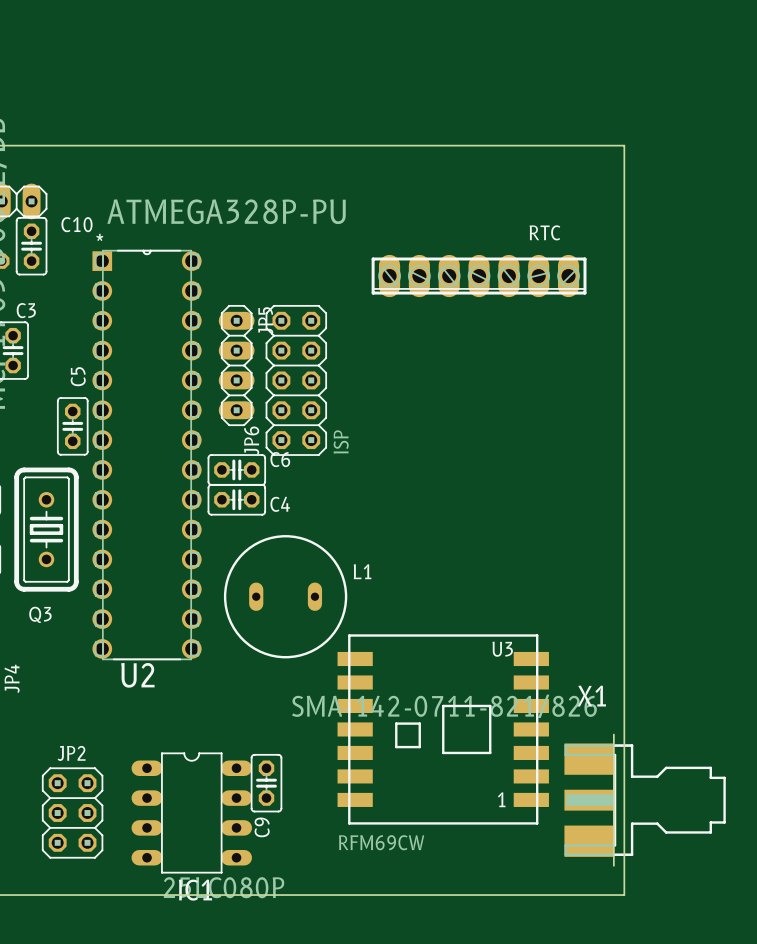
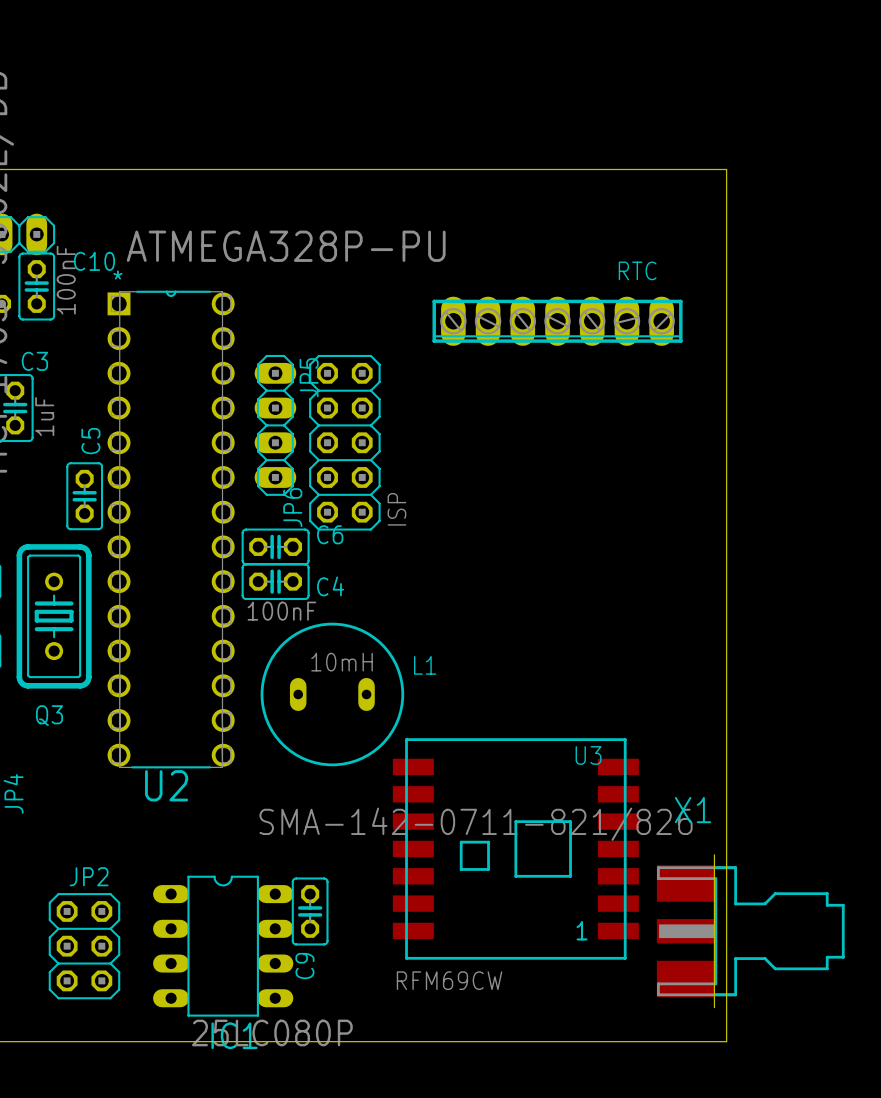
C10 value: none -> 100nF (66, 280)
C3 value: none -> 1uF (44, 416)
C4 value: none -> 100nF (281, 611)
L1 value: none -> 10mH (342, 662)

